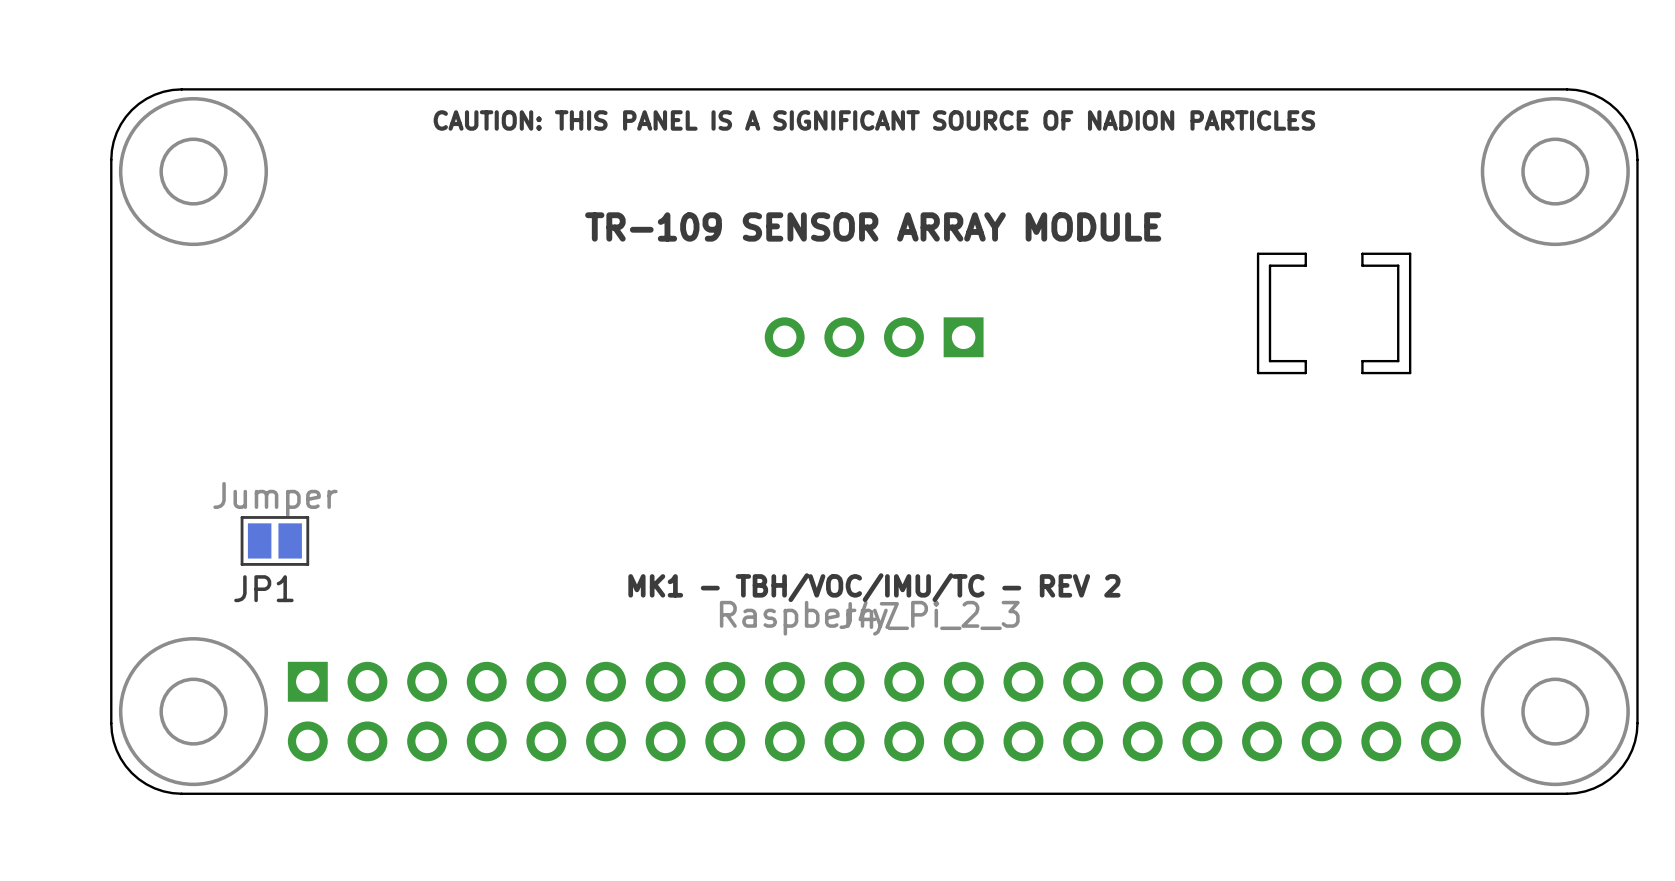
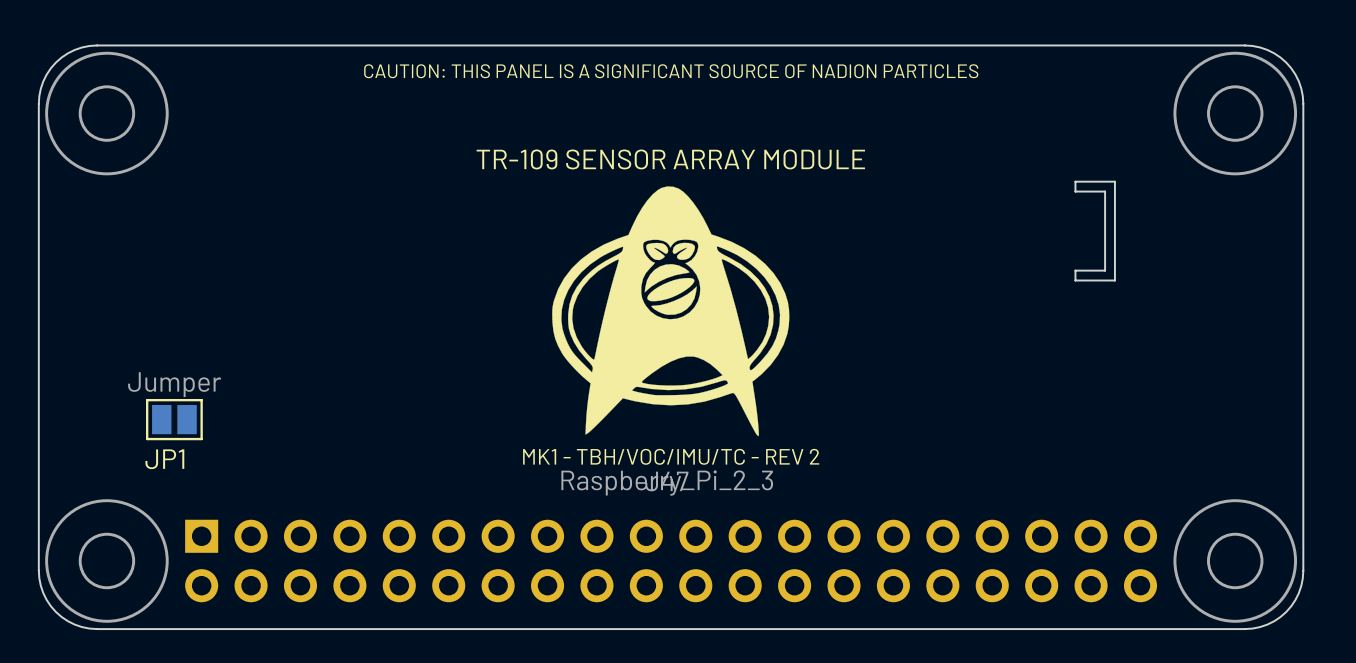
board edge: (1305, 253) (1305, 265) (1269, 265) (1269, 361) (1305, 361) (1305, 373) (1258, 373) (1258, 253) (1305, 253) -> none
drawing: none -> [552, 186, 790, 437]
part: (874, 337) -> none

